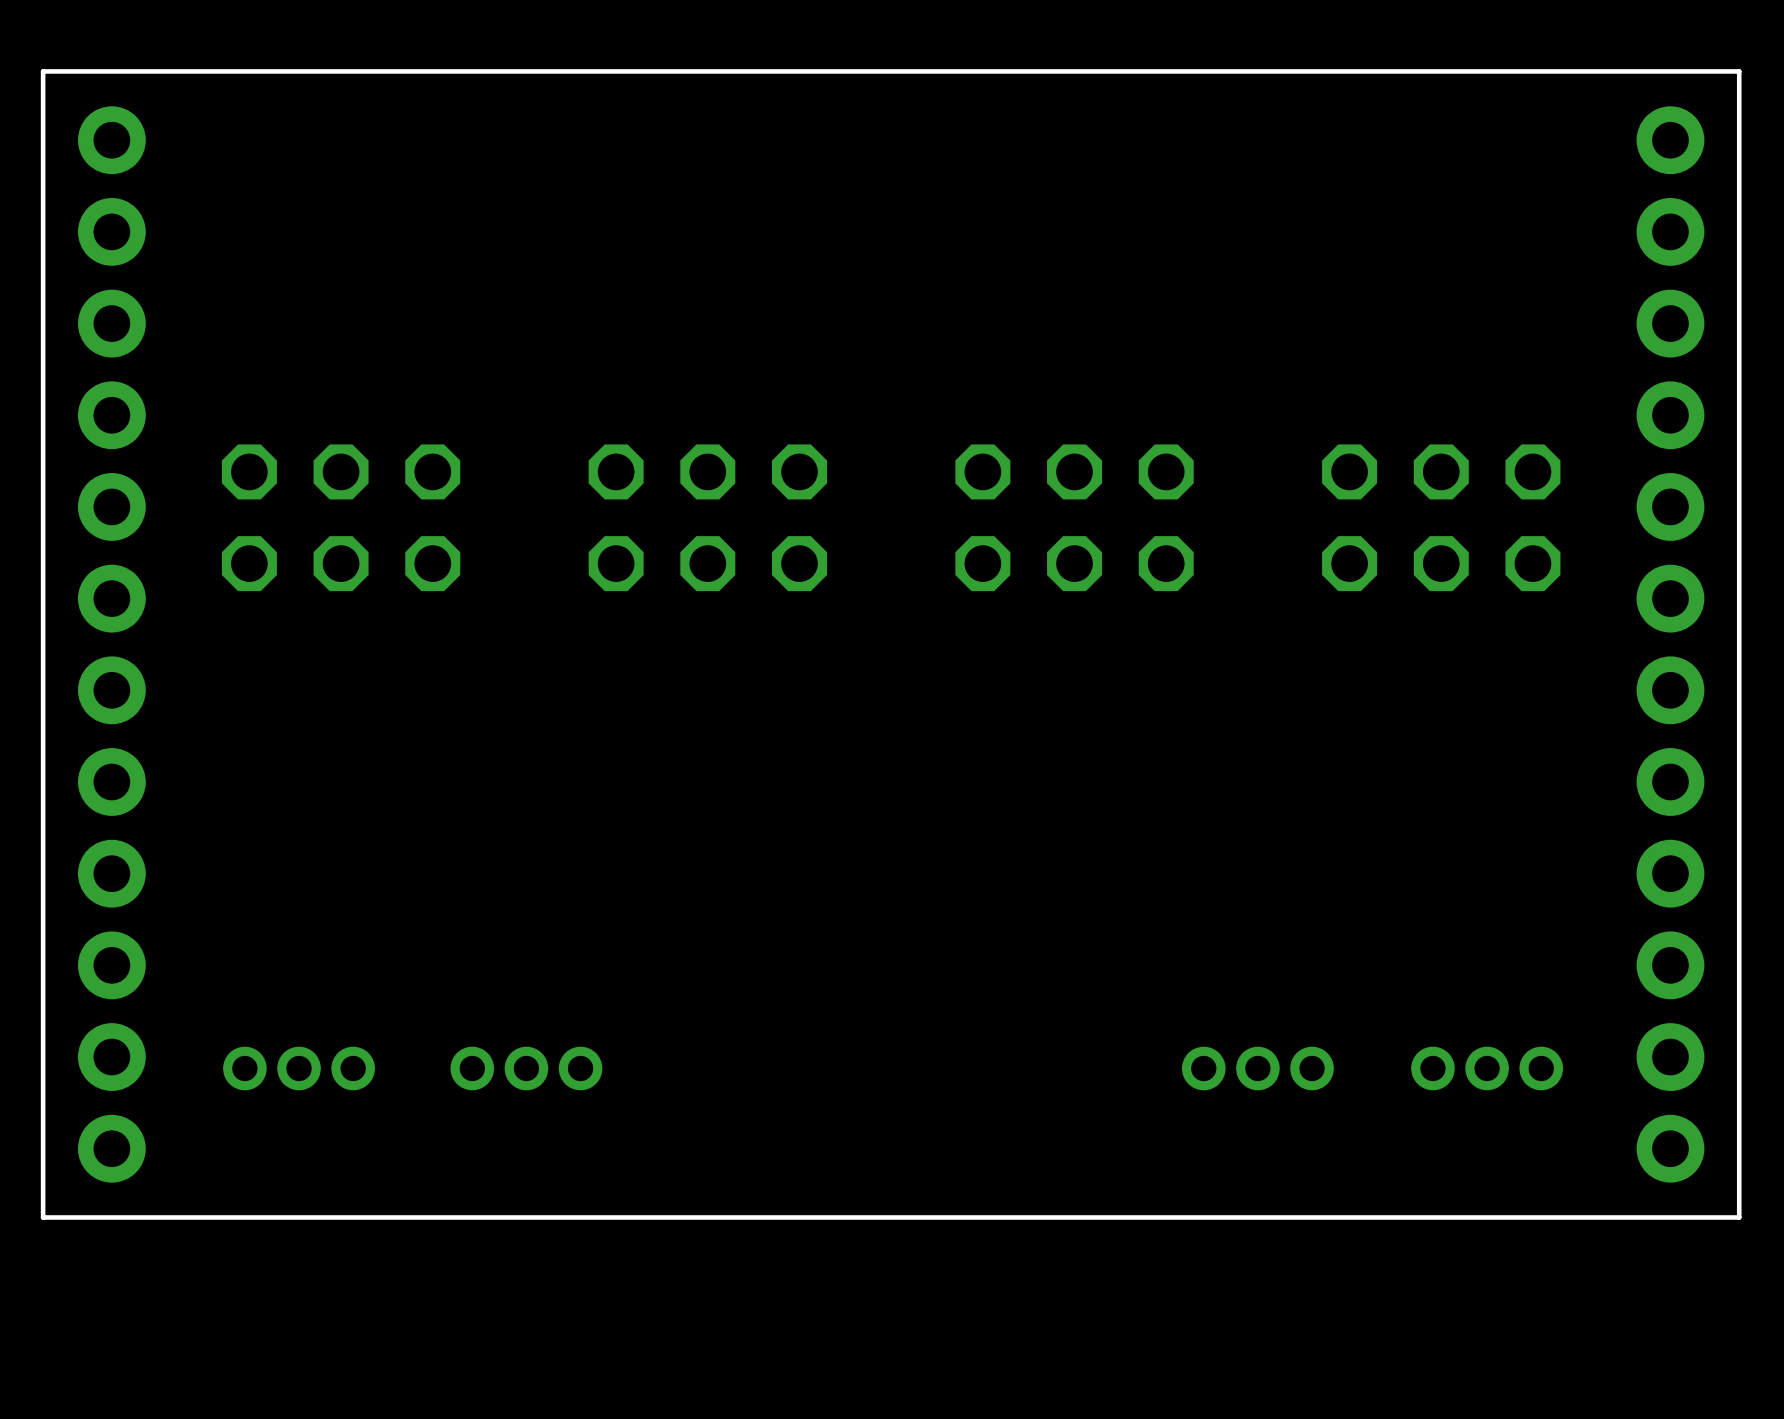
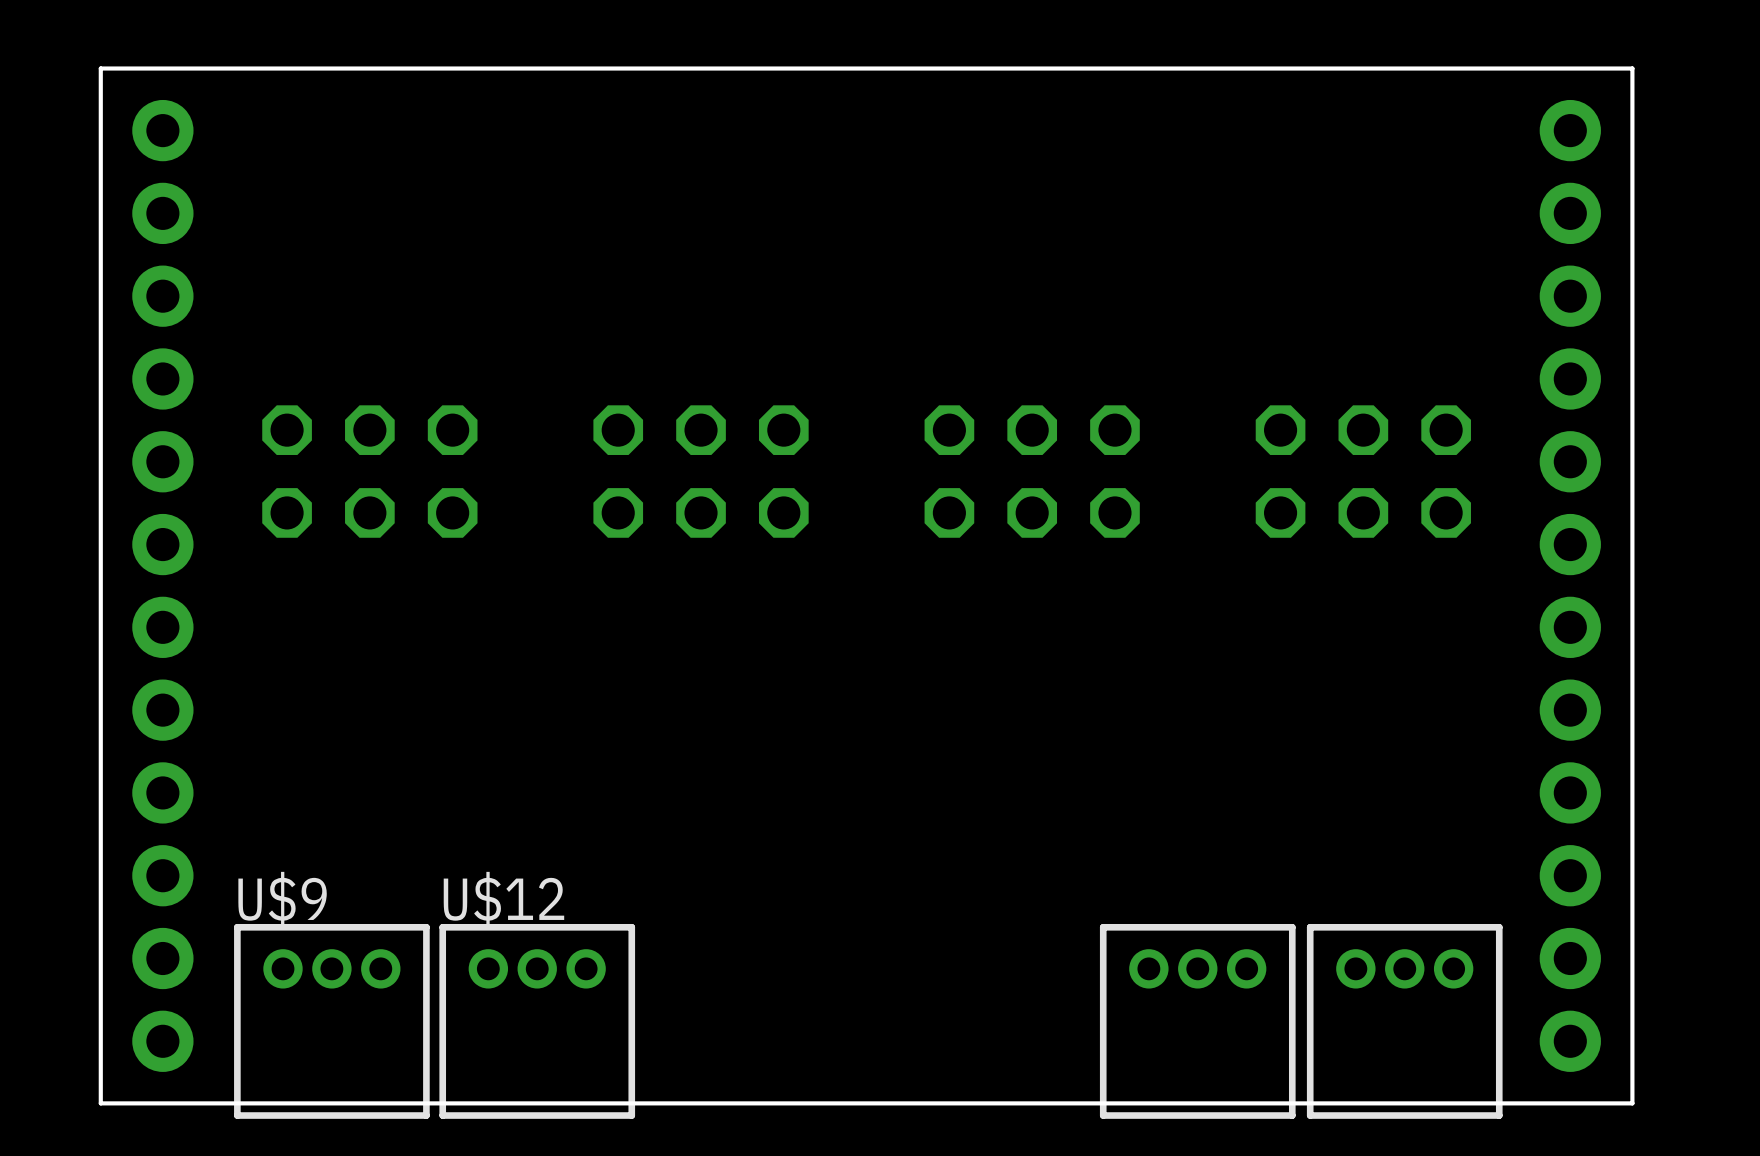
U$9 side: top (299, 1068) -> bottom (331, 1021)
U$12 side: top (526, 1068) -> bottom (537, 1021)
part side: top (1257, 1068) -> bottom (1197, 1021)
part side: top (1487, 1068) -> bottom (1404, 1021)

